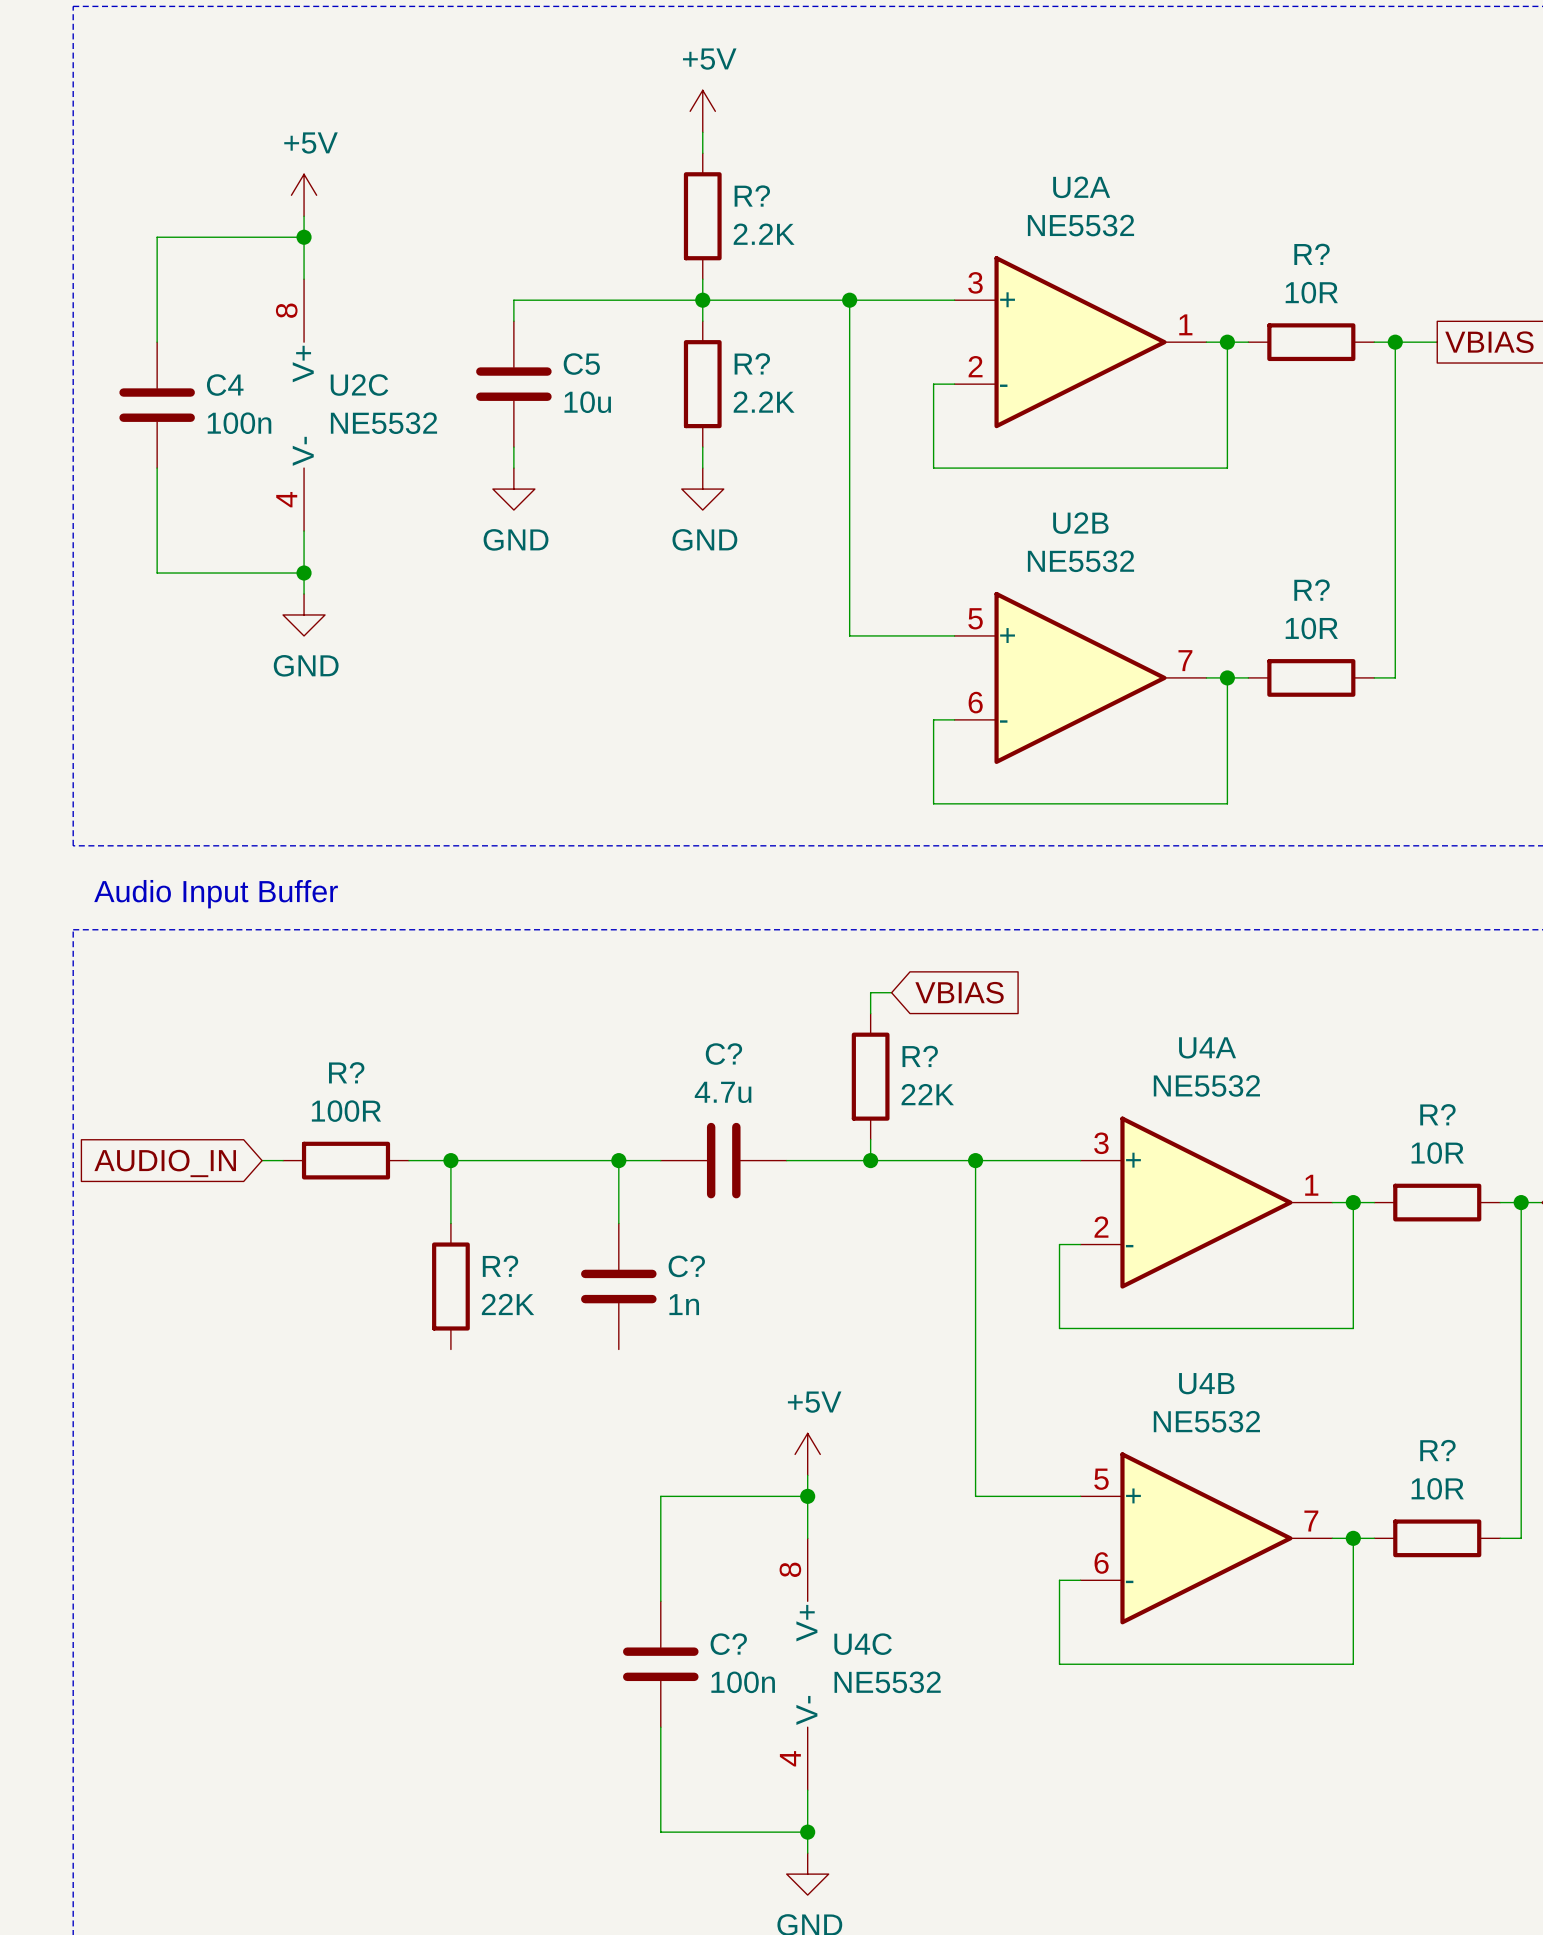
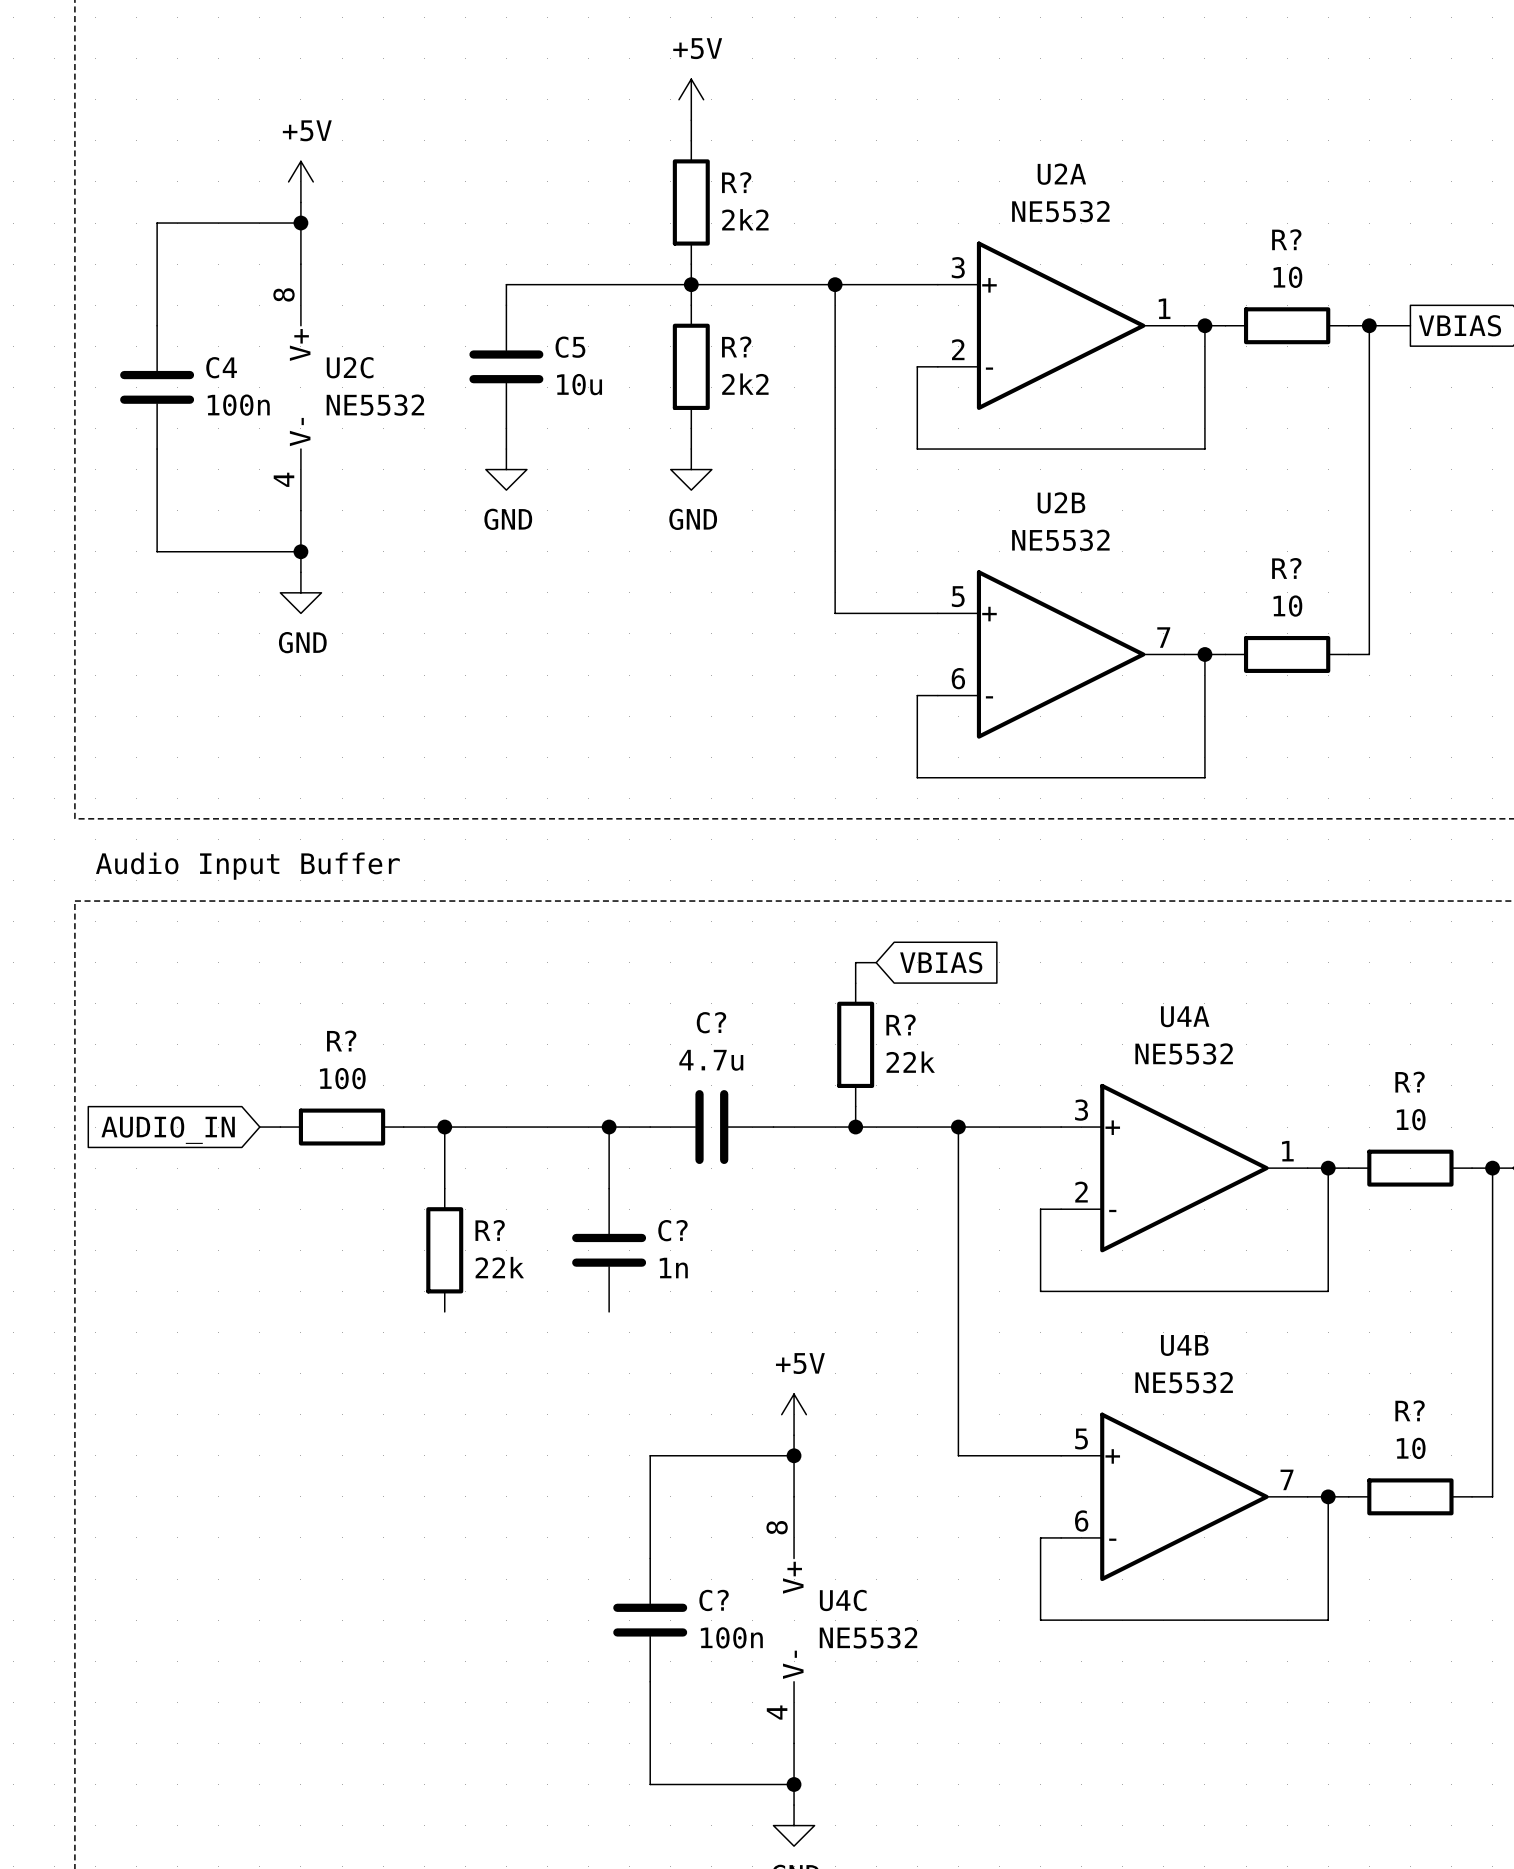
R? value: 2.2K (764, 234) -> 2k2 (745, 219)
R? value: 10R (1311, 292) -> 10 (1287, 277)
R? value: 2.2K (764, 402) -> 2k2 (745, 384)
R? value: 10R (1311, 628) -> 10 (1287, 606)
R? value: 22K (927, 1094) -> 22k (910, 1062)
R? value: 100R (346, 1111) -> 100 (342, 1078)
R? value: 10R (1437, 1153) -> 10 (1411, 1119)
R? value: 22K (508, 1304) -> 22k (499, 1267)
R? value: 10R (1437, 1488) -> 10 (1411, 1448)

